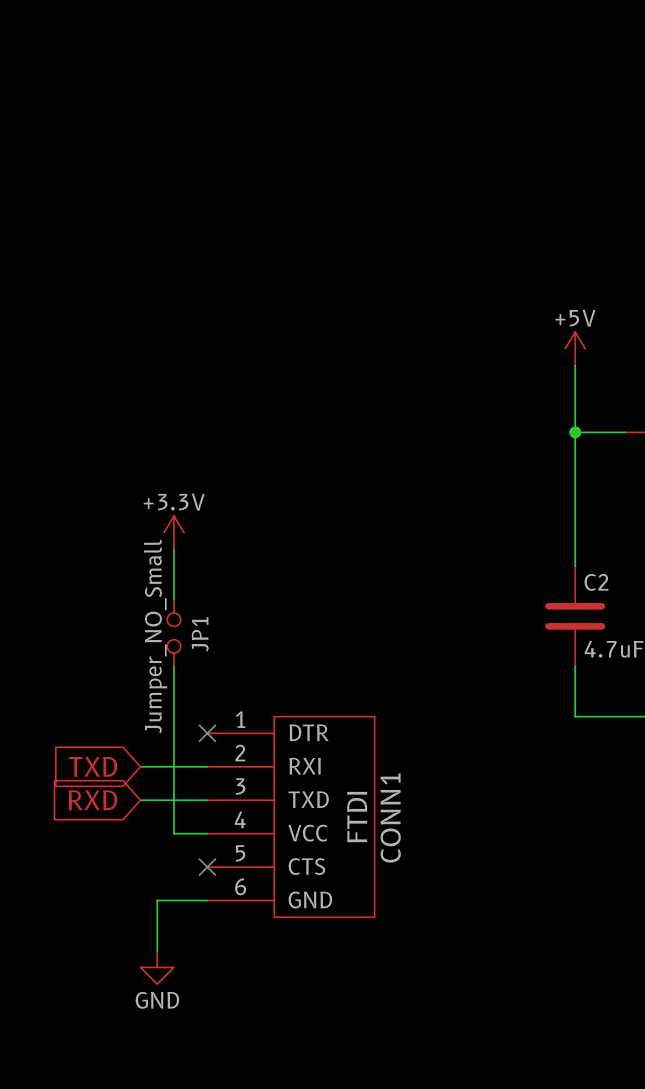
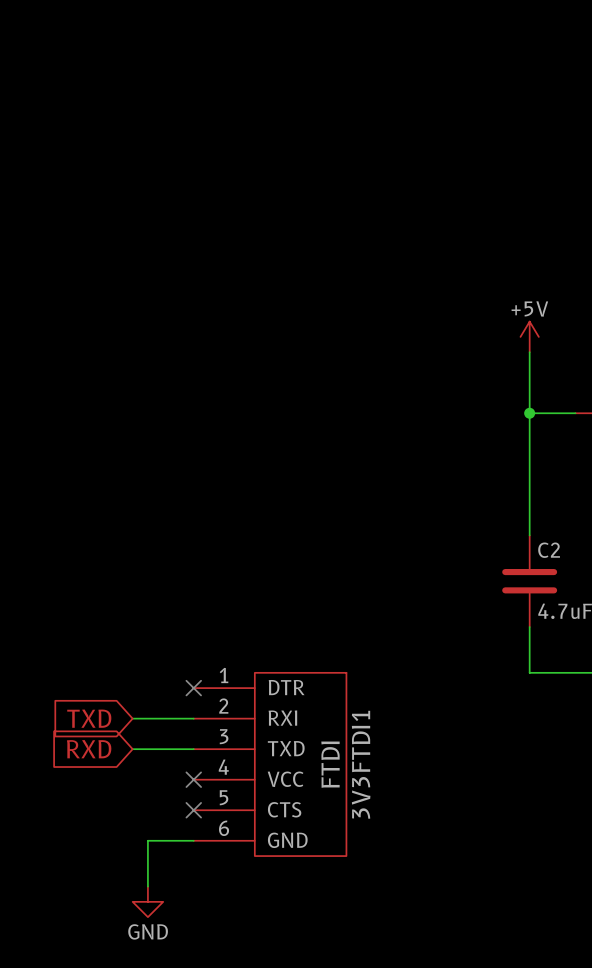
power symbol: +3.3V (173, 532) -> none
wire: (173, 549) (173, 599) -> none
JP1: Jumper_NO_Small (173, 633) -> none
wire: (173, 666) (173, 833) (207, 833) -> none
CONN1 name: CONN1 (390, 818) -> 3V3FTDI1 (361, 764)
no-connect mark: none -> (193, 779)

